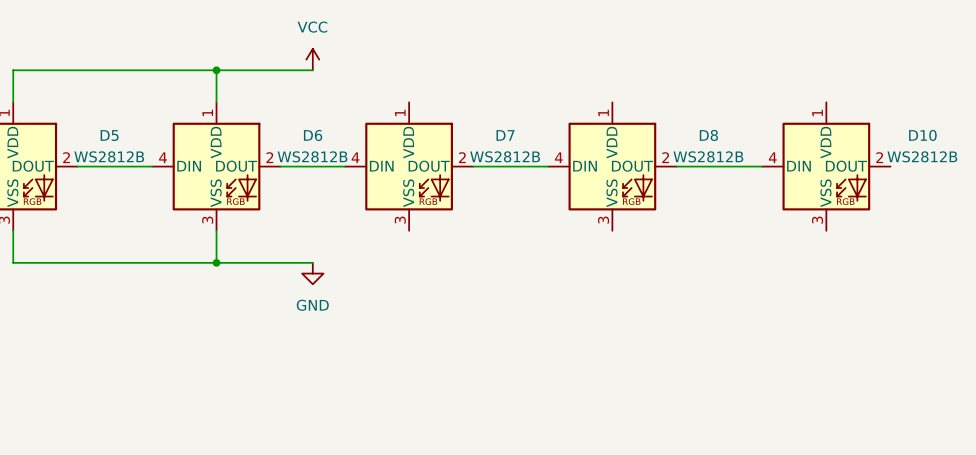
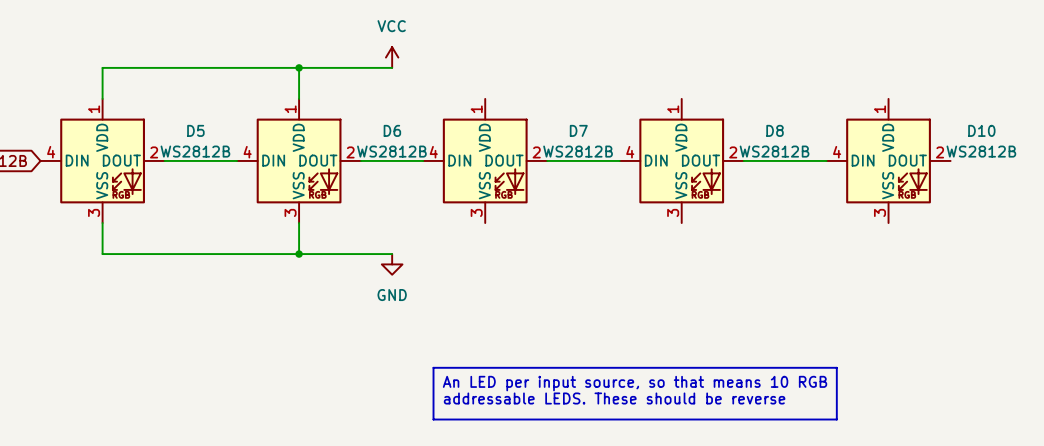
line: none -> (433, 367) (836, 367) (836, 419) (433, 419) (433, 367)
text: none -> An LED per input source, so that means 10 RGB (635, 383)
text: none -> addressable LEDS. These should be reverse (614, 398)

